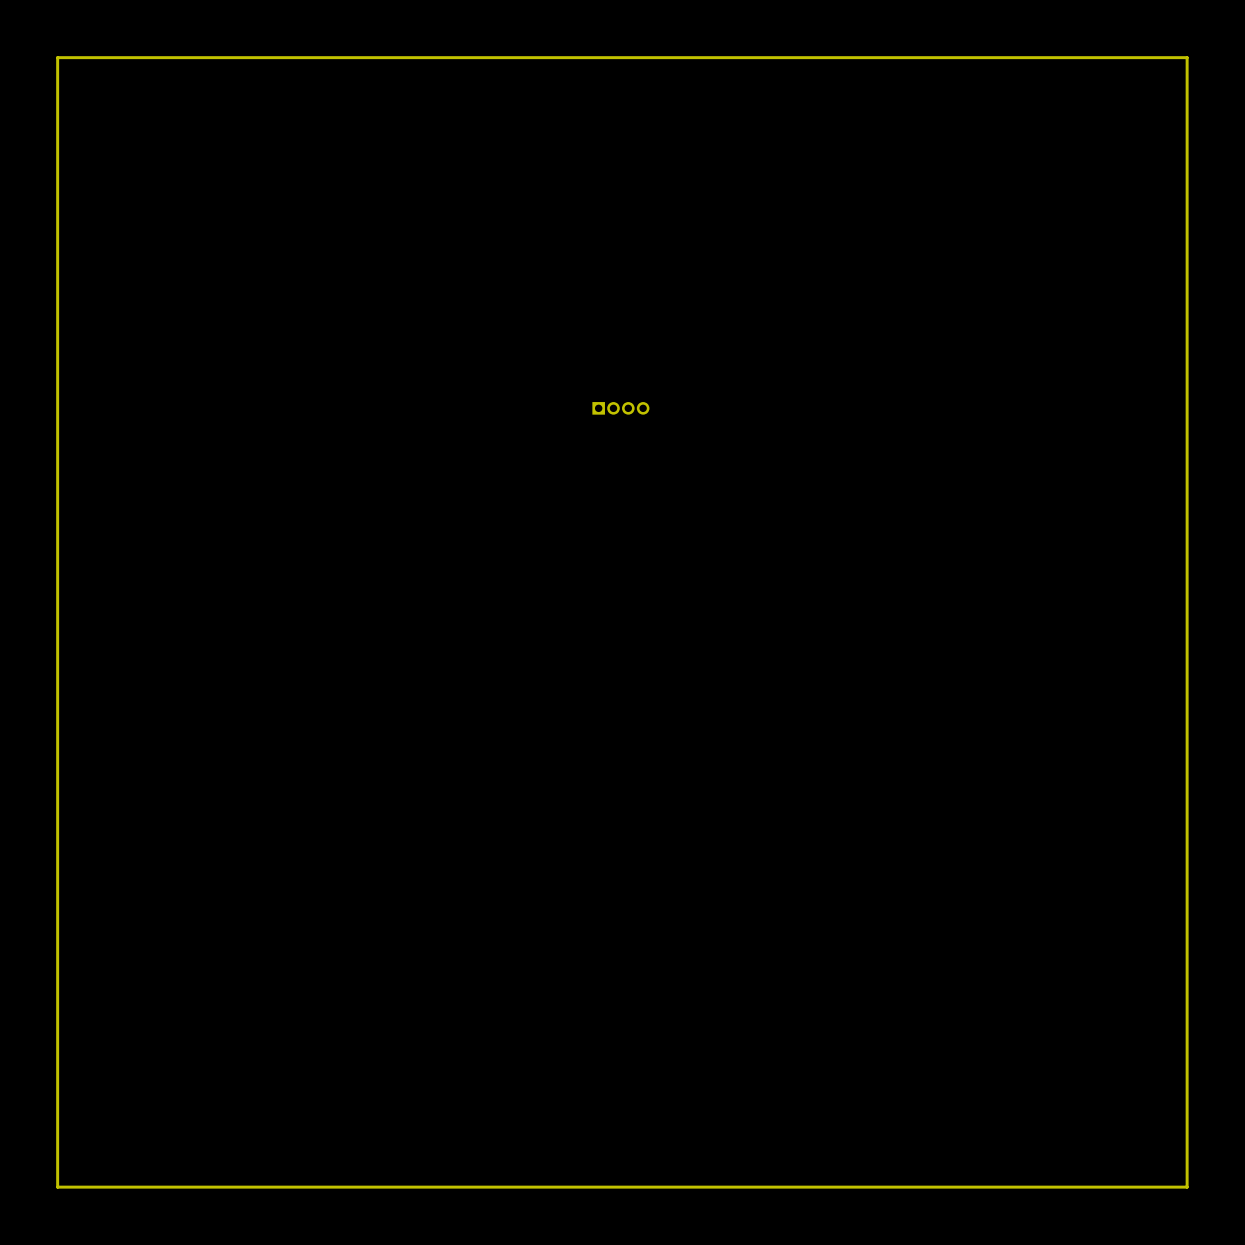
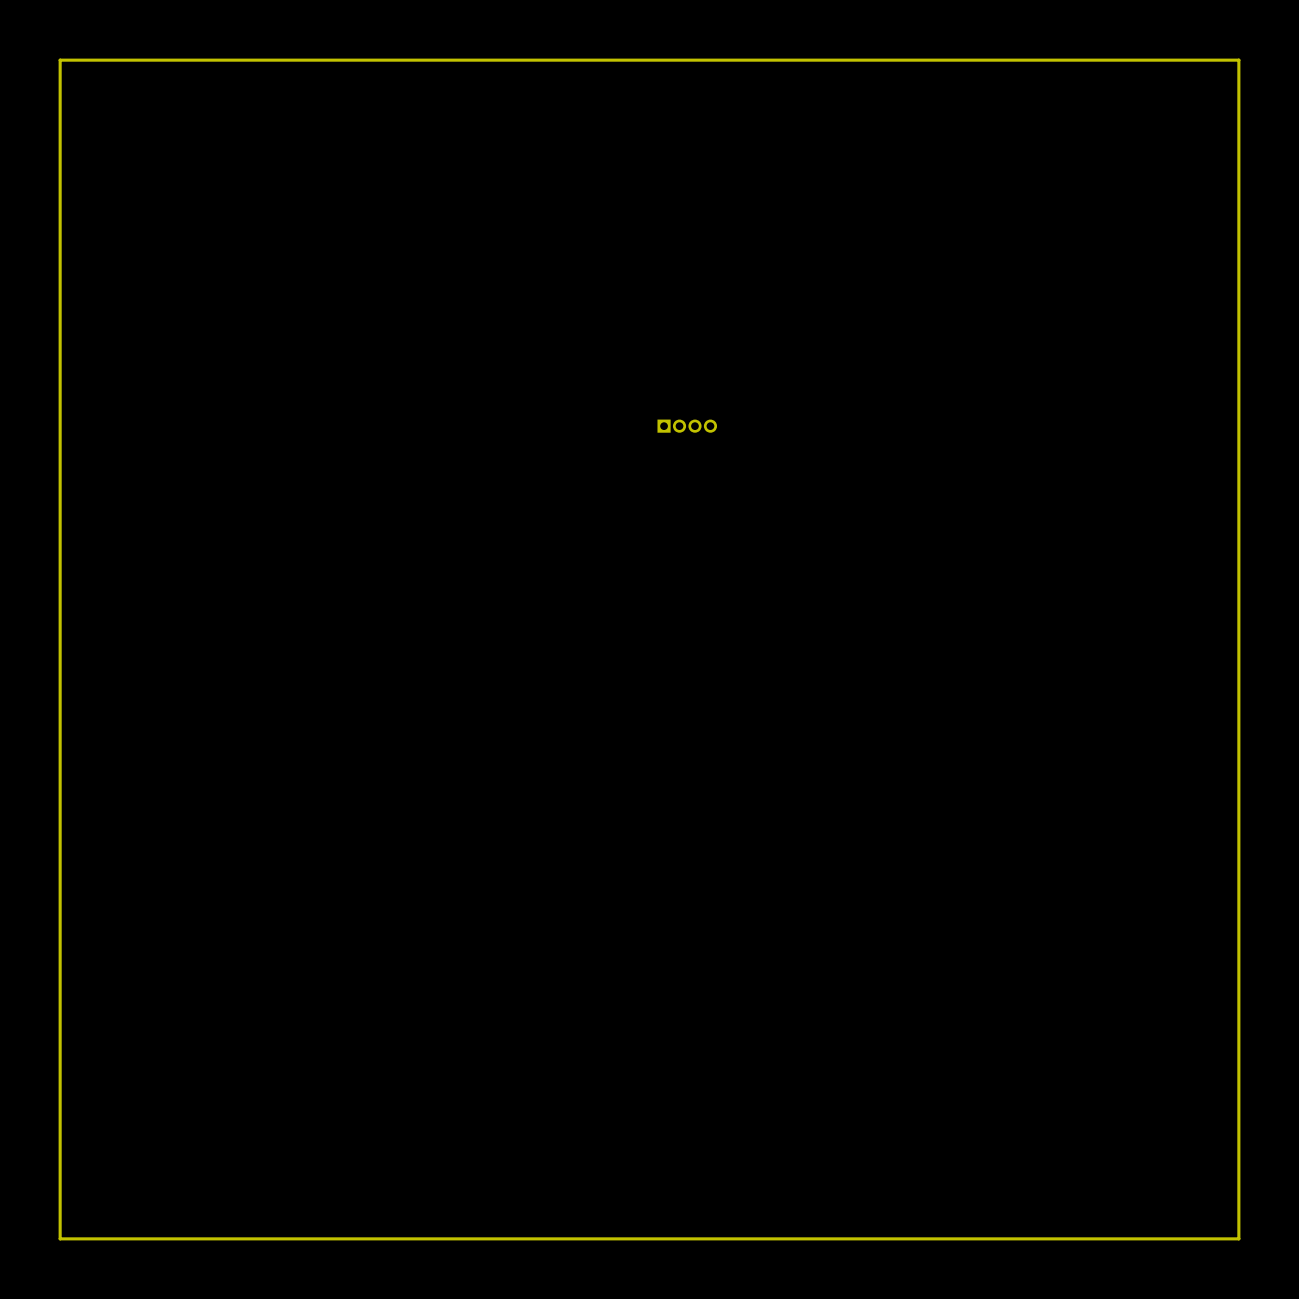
part position: (620, 408) -> (687, 426)

